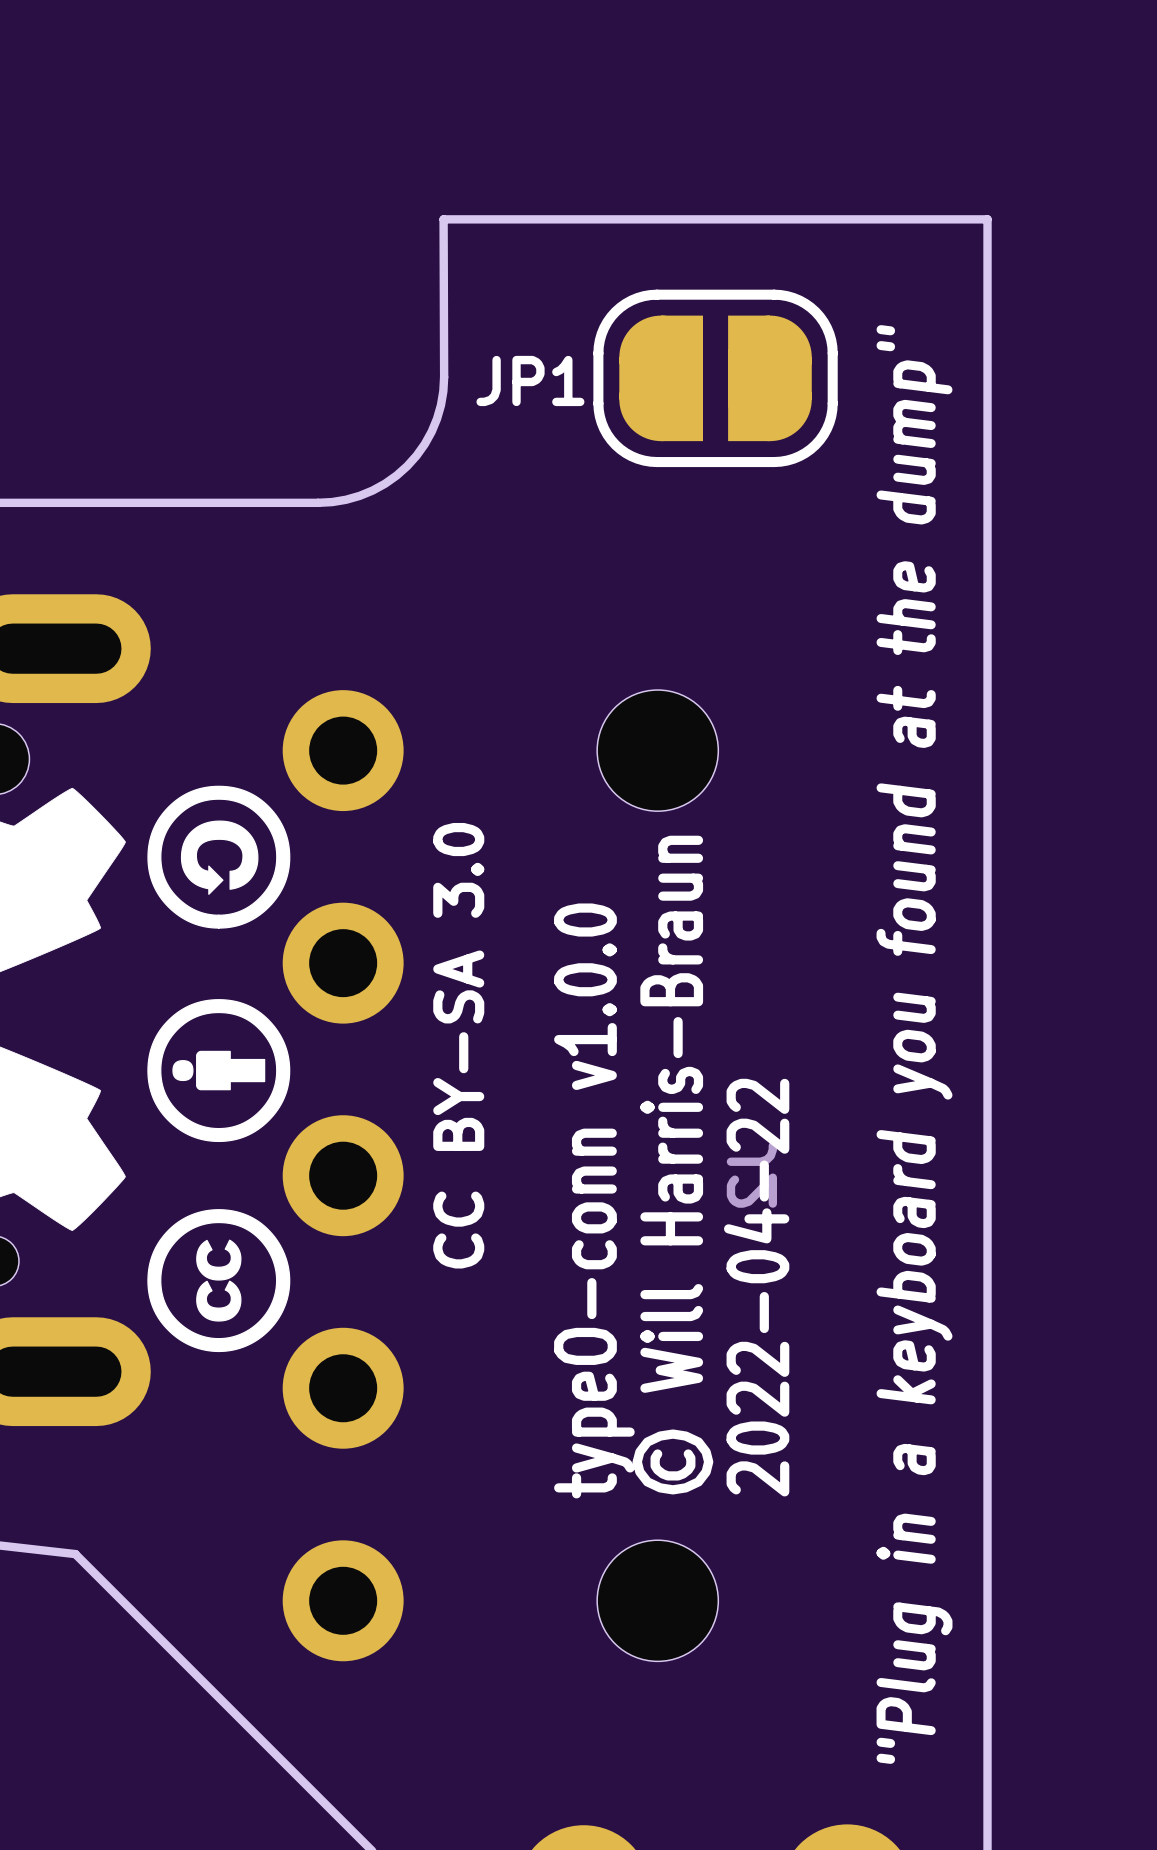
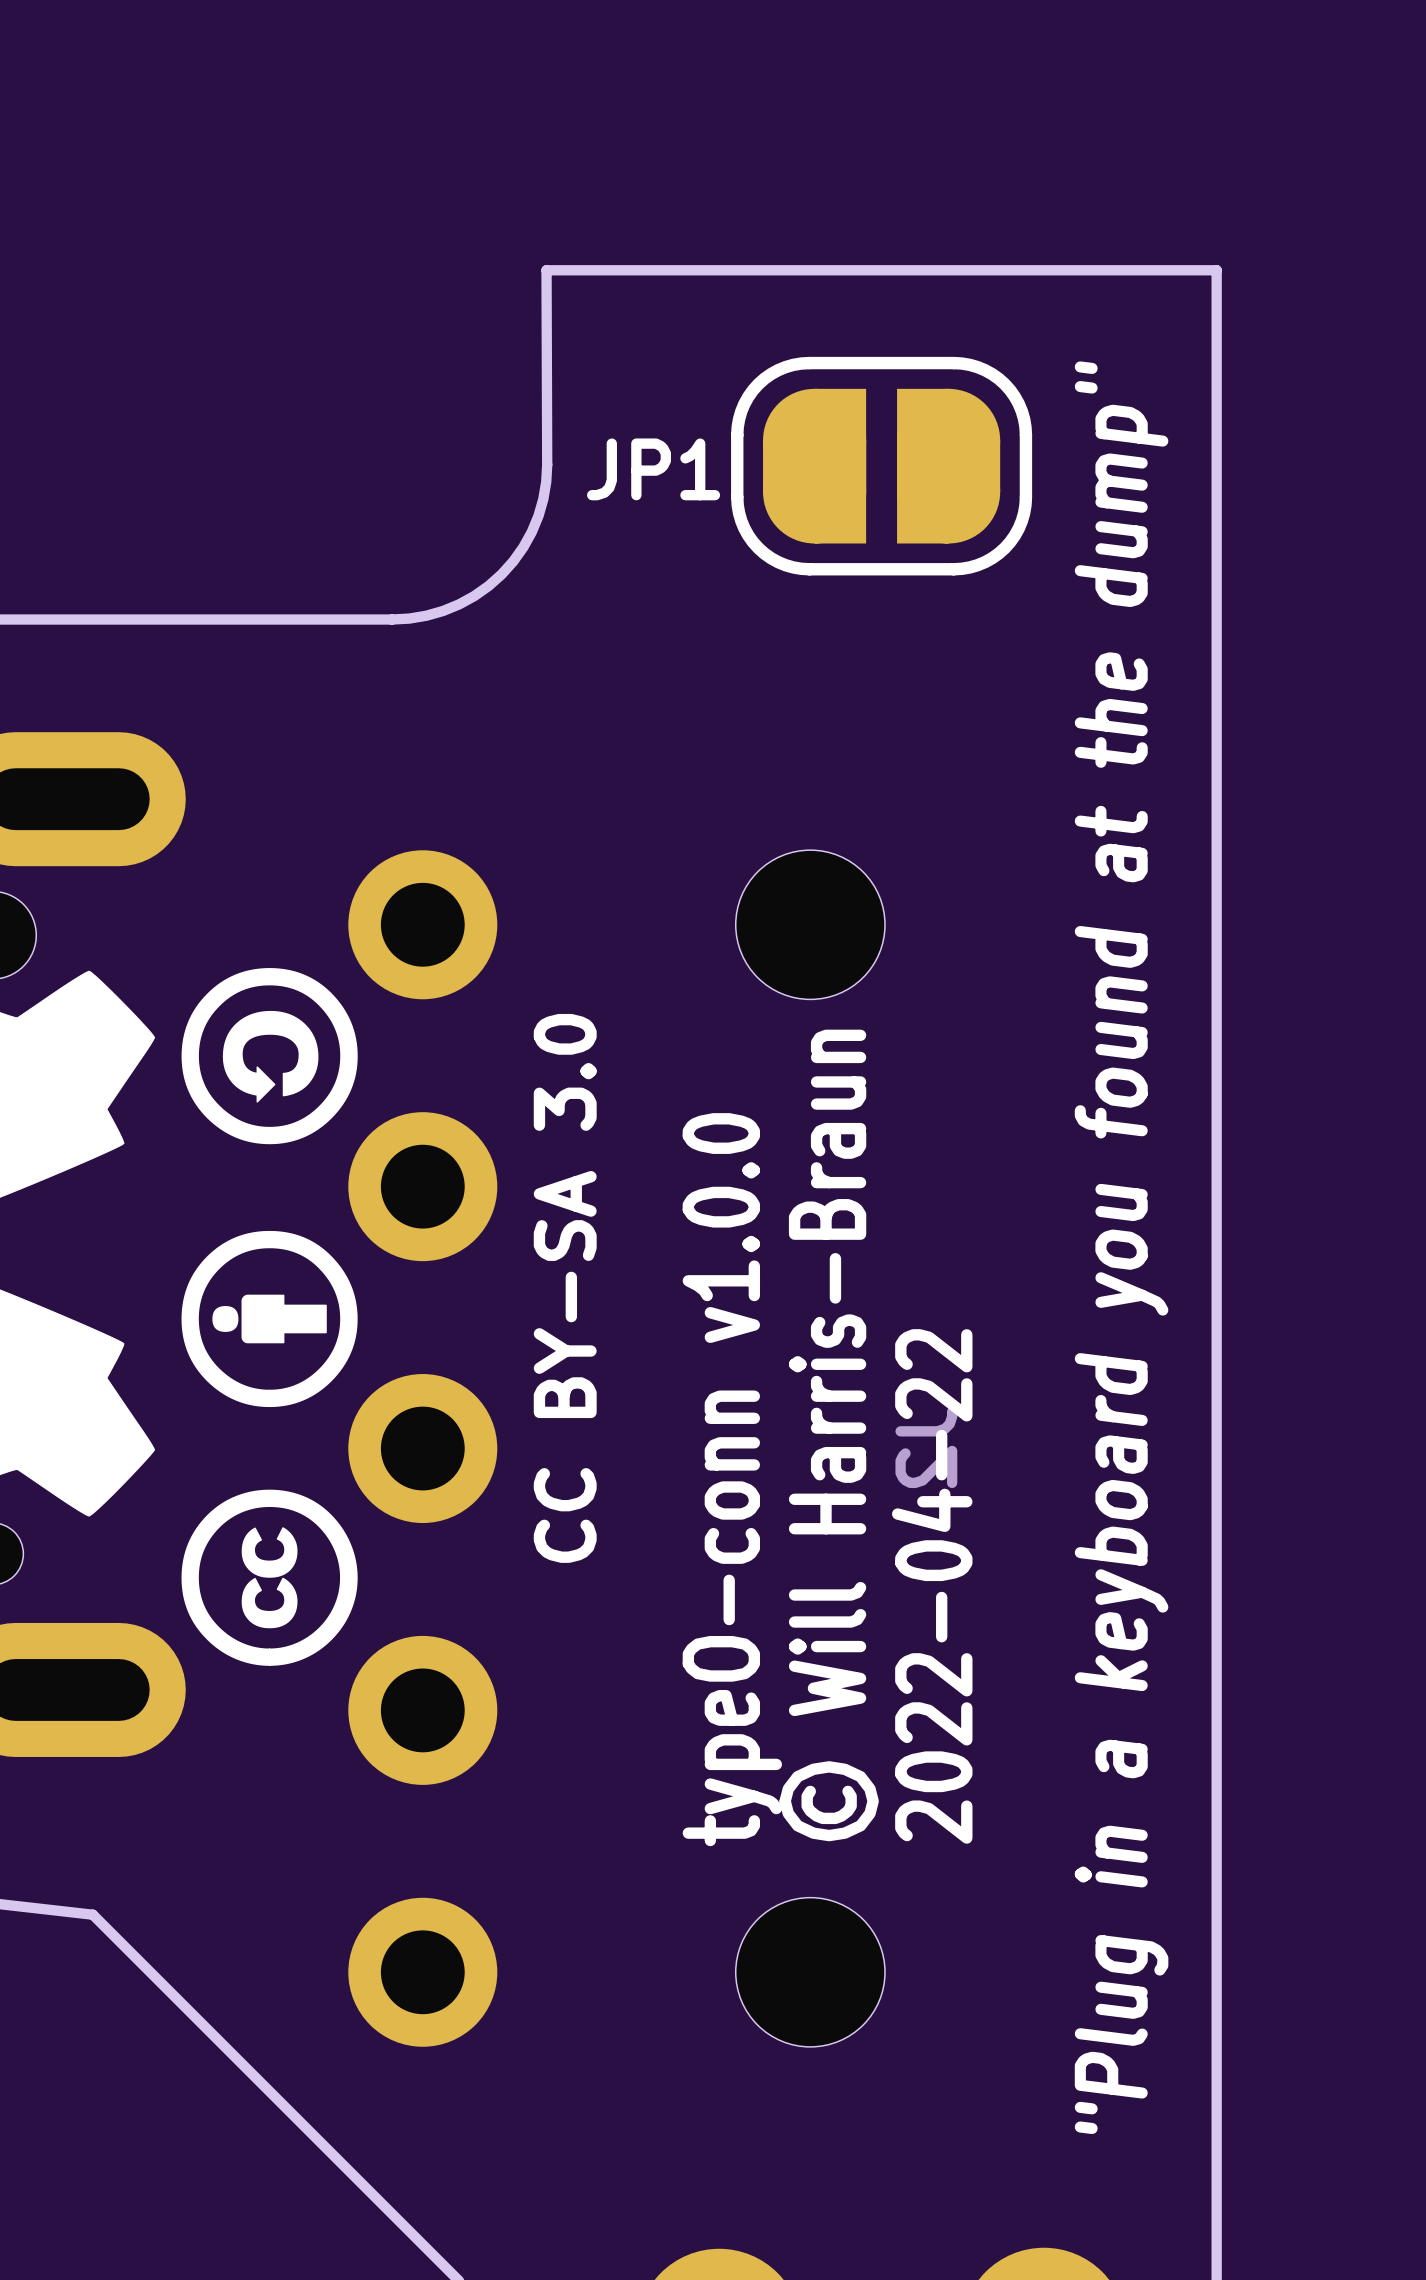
text position: "Plug in a keyboard you found at the dump" (914, 1044) -> "Plug in a keyboard you found at the dump" (1121, 1247)

